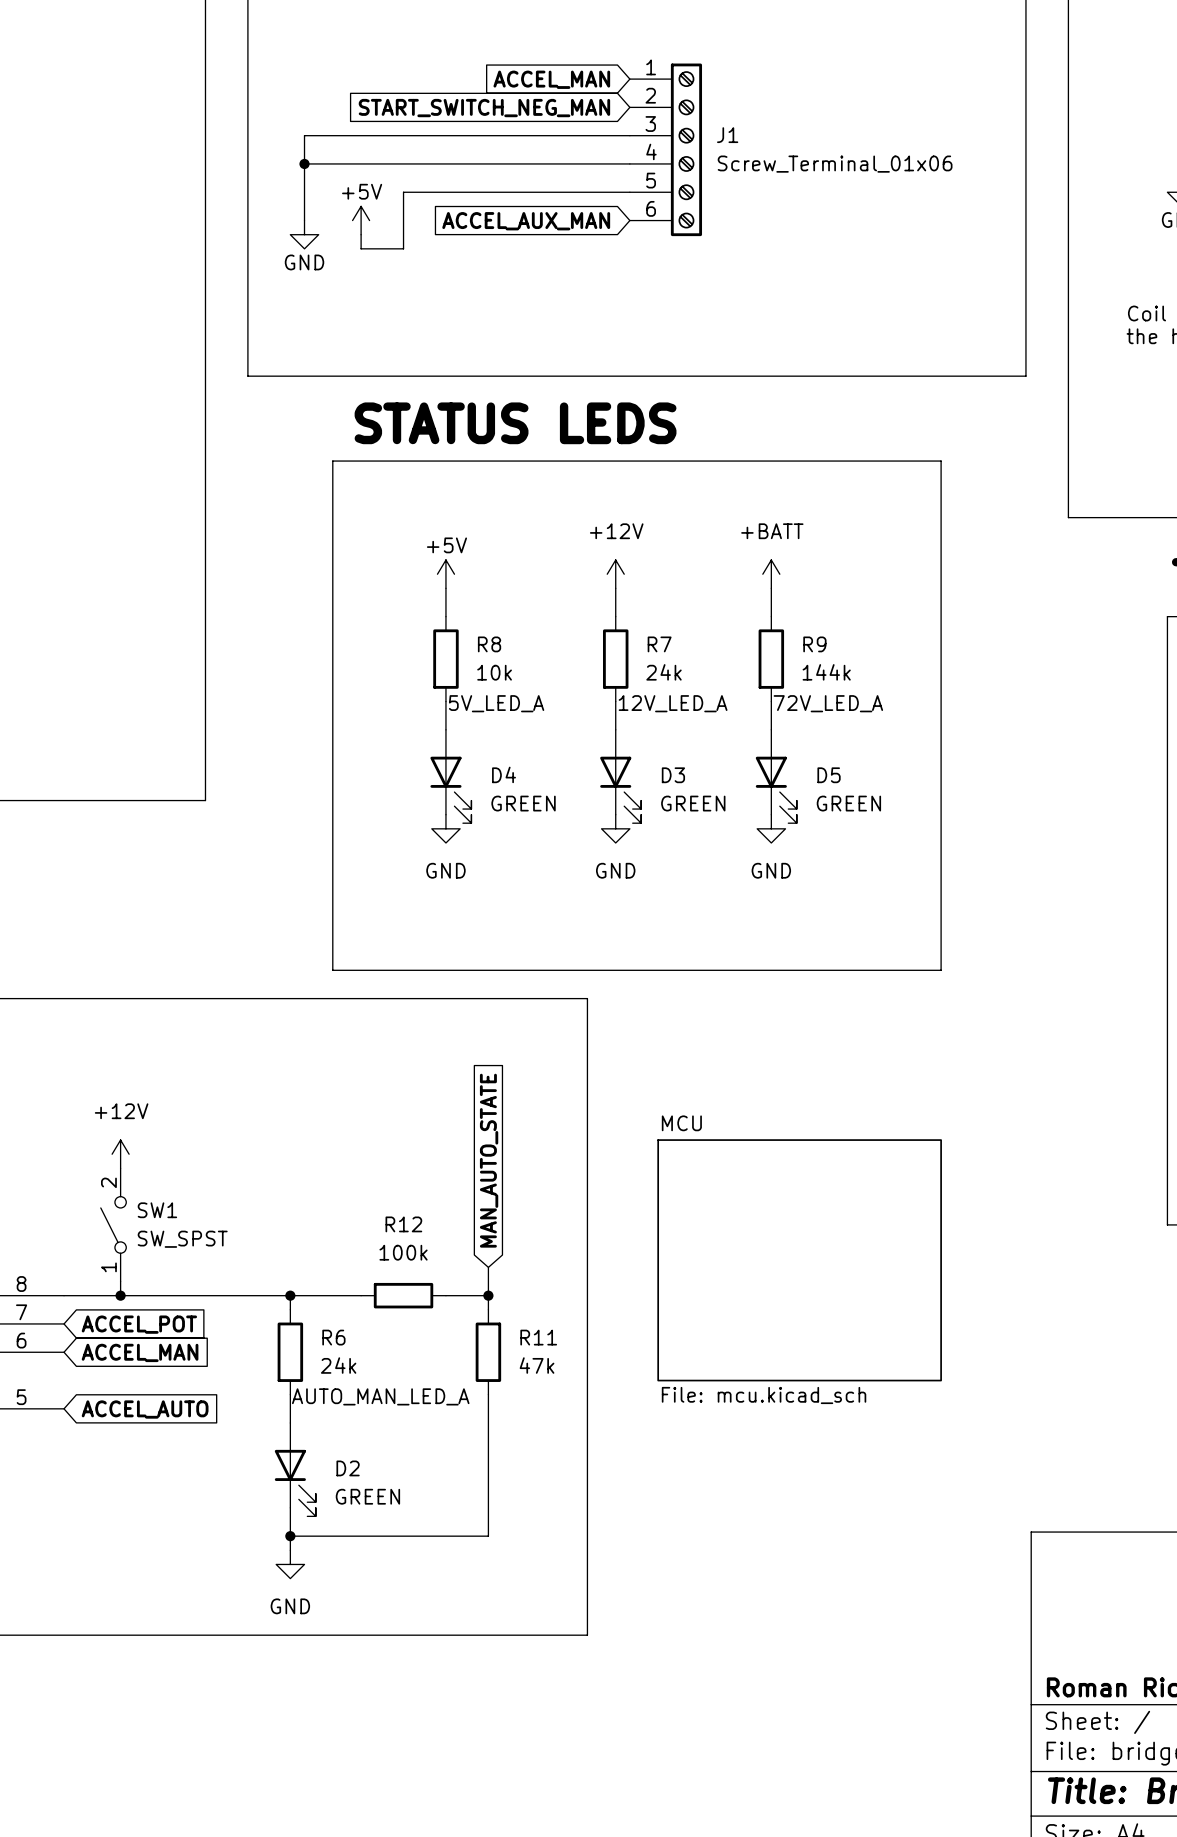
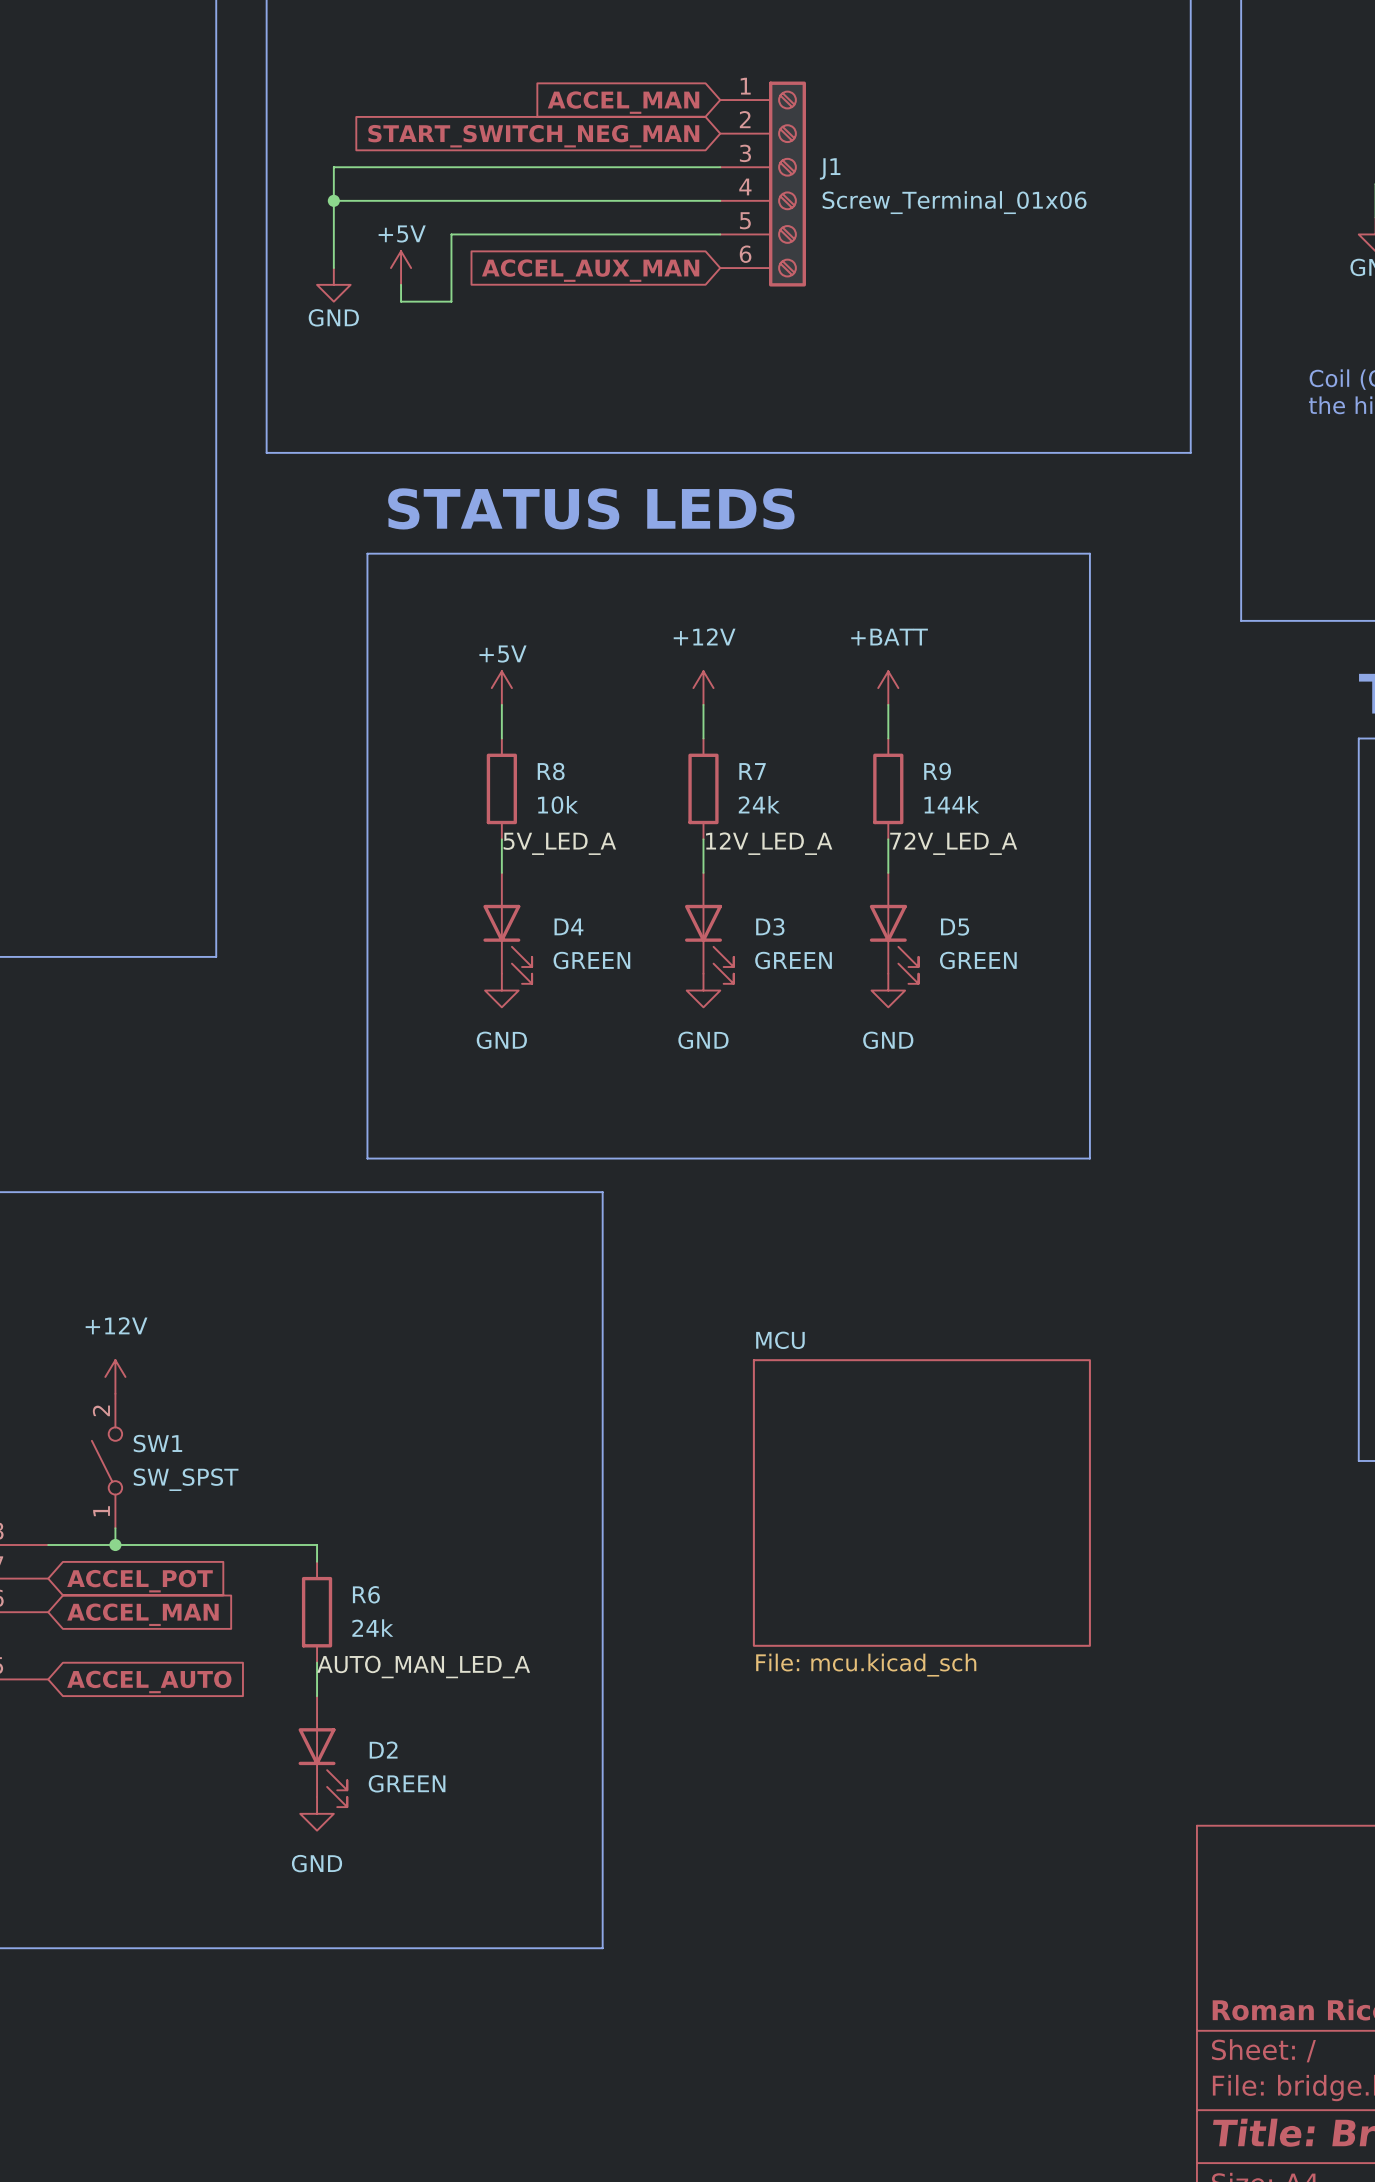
line: (530, 998) (587, 998) (587, 1635) (530, 1635) -> (602, 1192) (602, 1948)
global label: MAN_AUTO_STATE (489, 1160) -> none
wire: (488, 1267) (488, 1309) -> none
wire: (290, 1295) (361, 1295) -> none
junction: (290, 1295) -> none
R12: 100k (403, 1295) -> none
wire: (445, 1295) (488, 1295) -> none
junction: (488, 1295) -> none
R11: 47k (488, 1352) -> none
wire: (488, 1394) (488, 1536) (290, 1536) -> none
wire: (290, 1507) (290, 1550) -> none
junction: (290, 1536) -> none
power symbol position: GND (290, 1564) -> GND (317, 1813)

